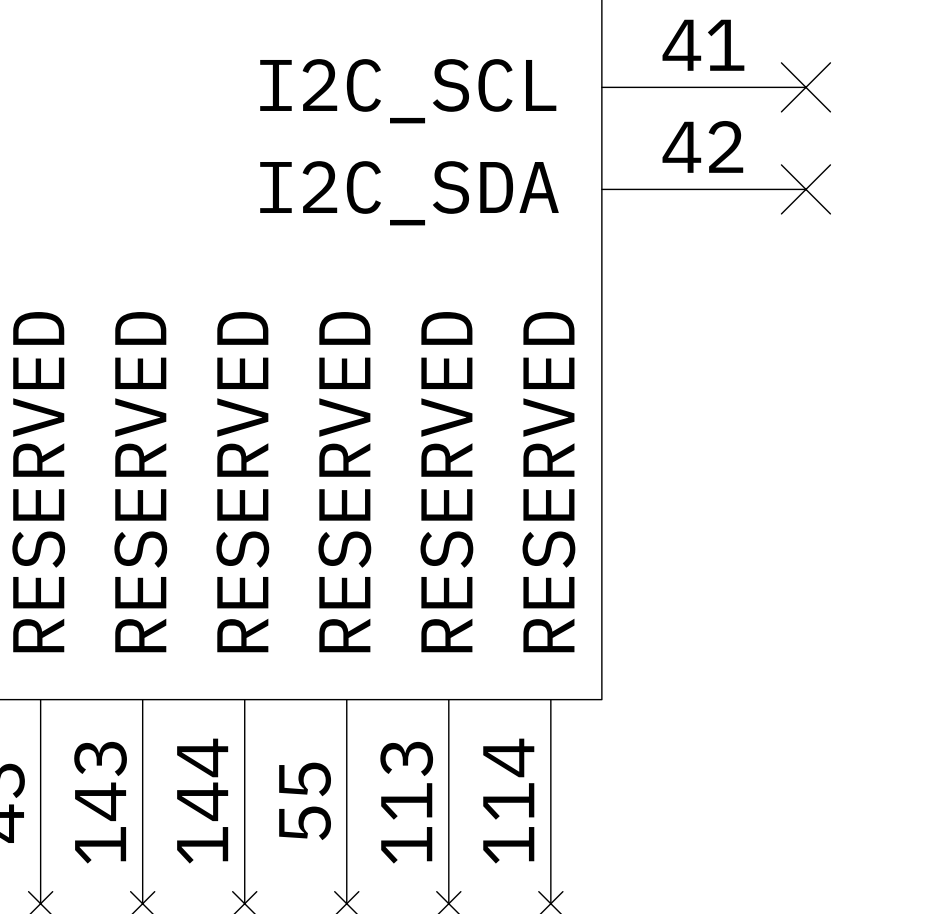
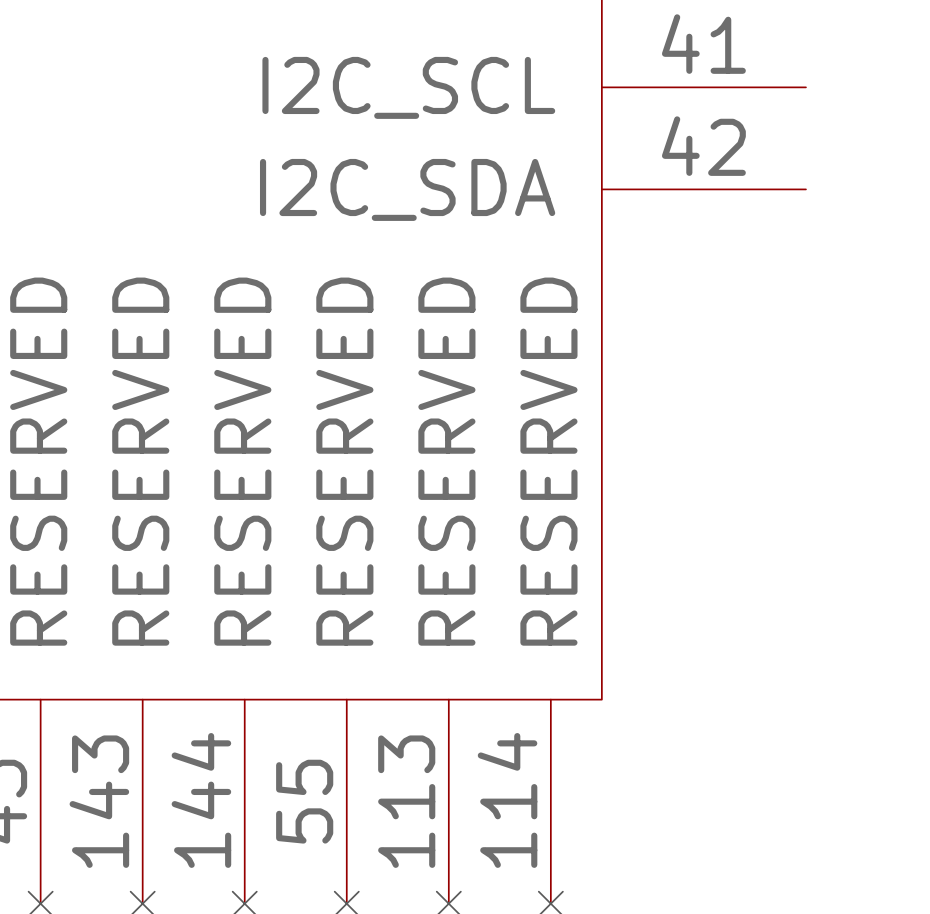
no-connect mark: (805, 87) -> none
no-connect mark: (805, 189) -> none

